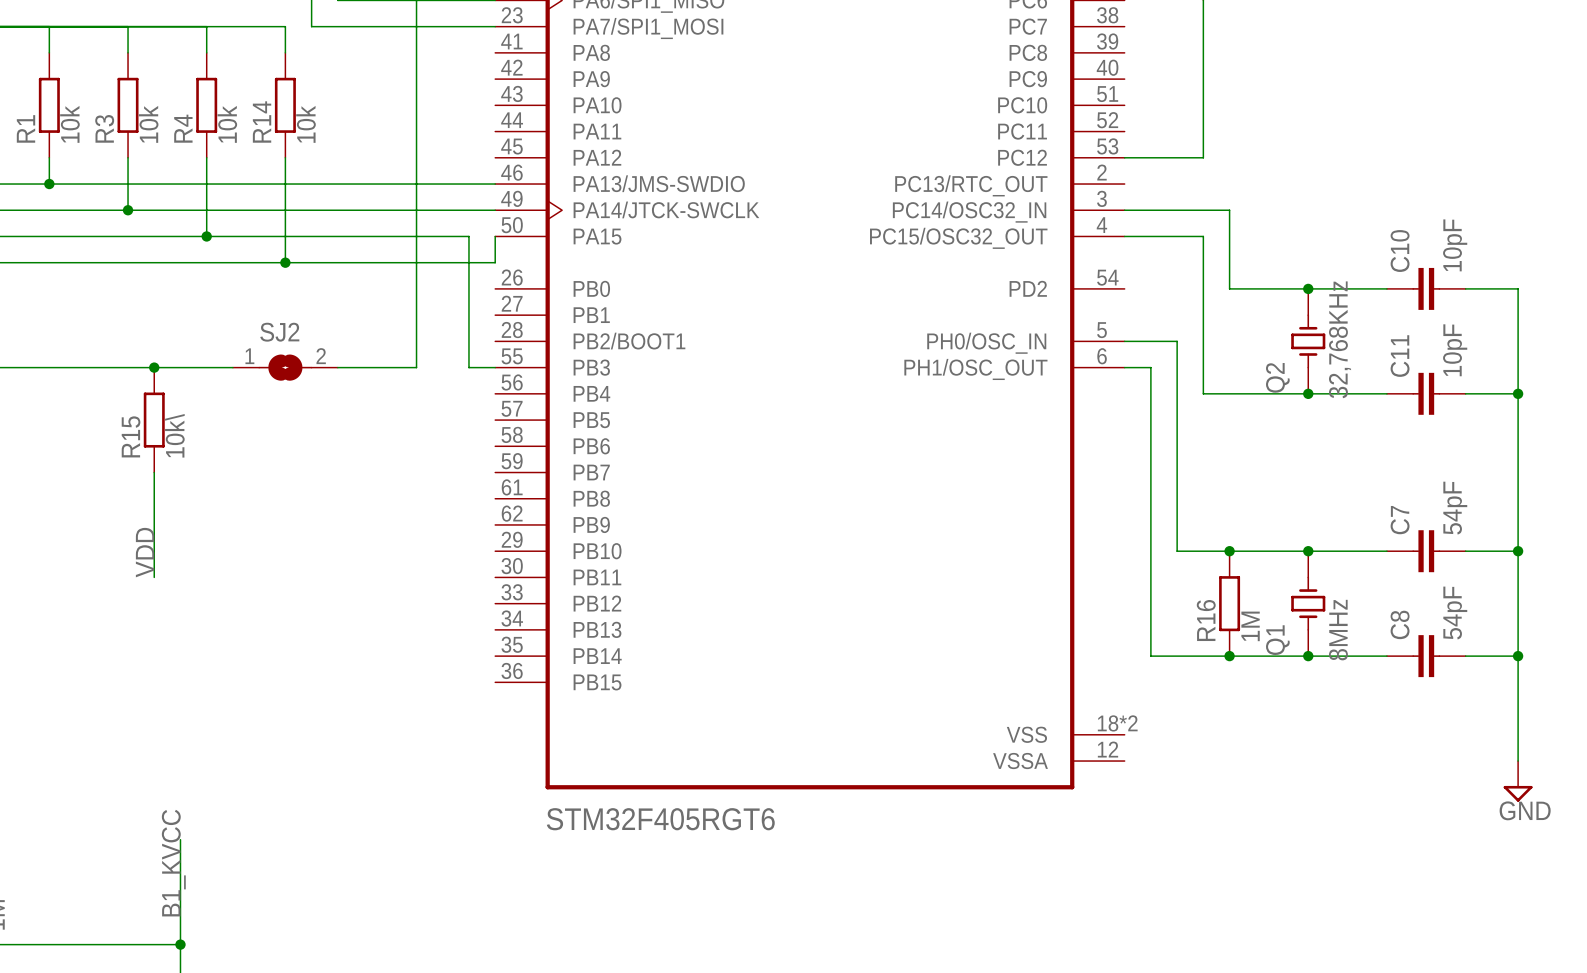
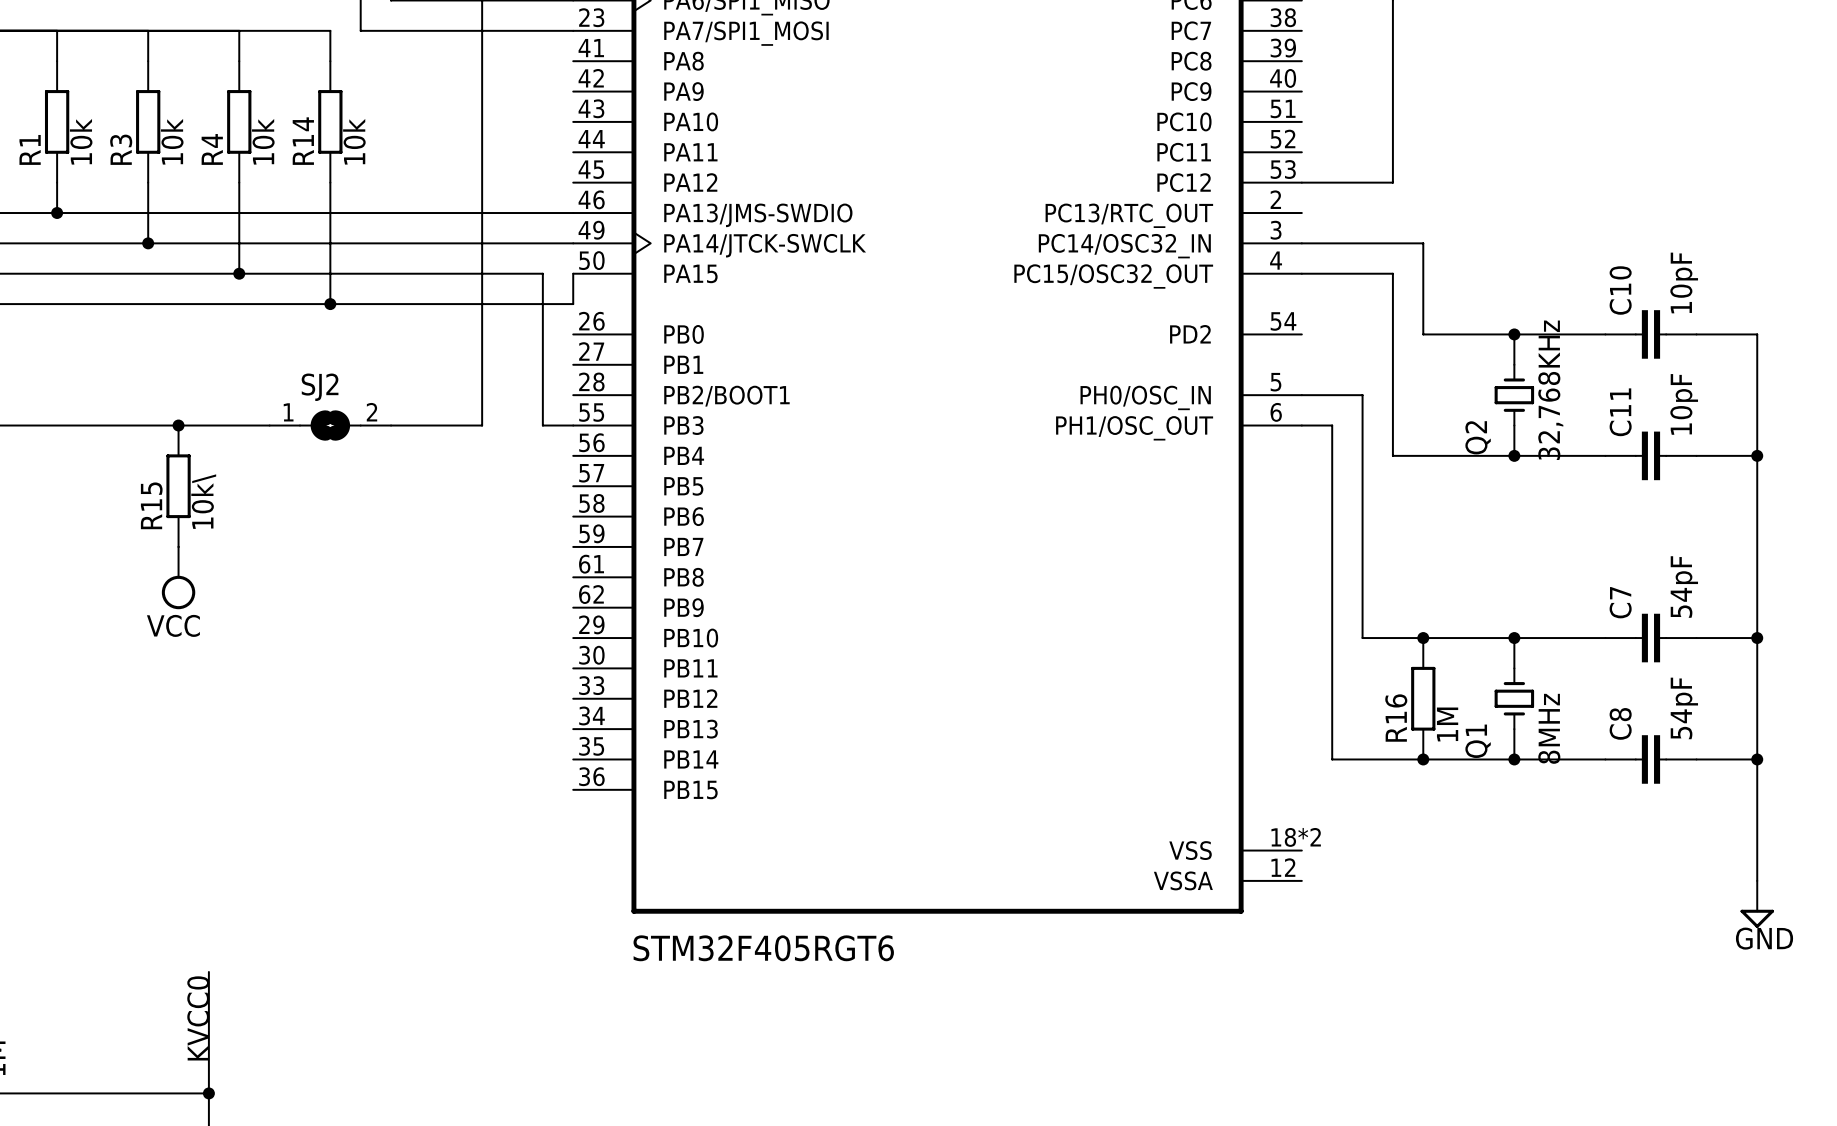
wire: (154, 472) (154, 577) -> none
power symbol: none -> VCC (178, 578)
label: VDD (145, 552) -> none
label: B1_KVCC (173, 863) -> KVCC0 (198, 1018)

